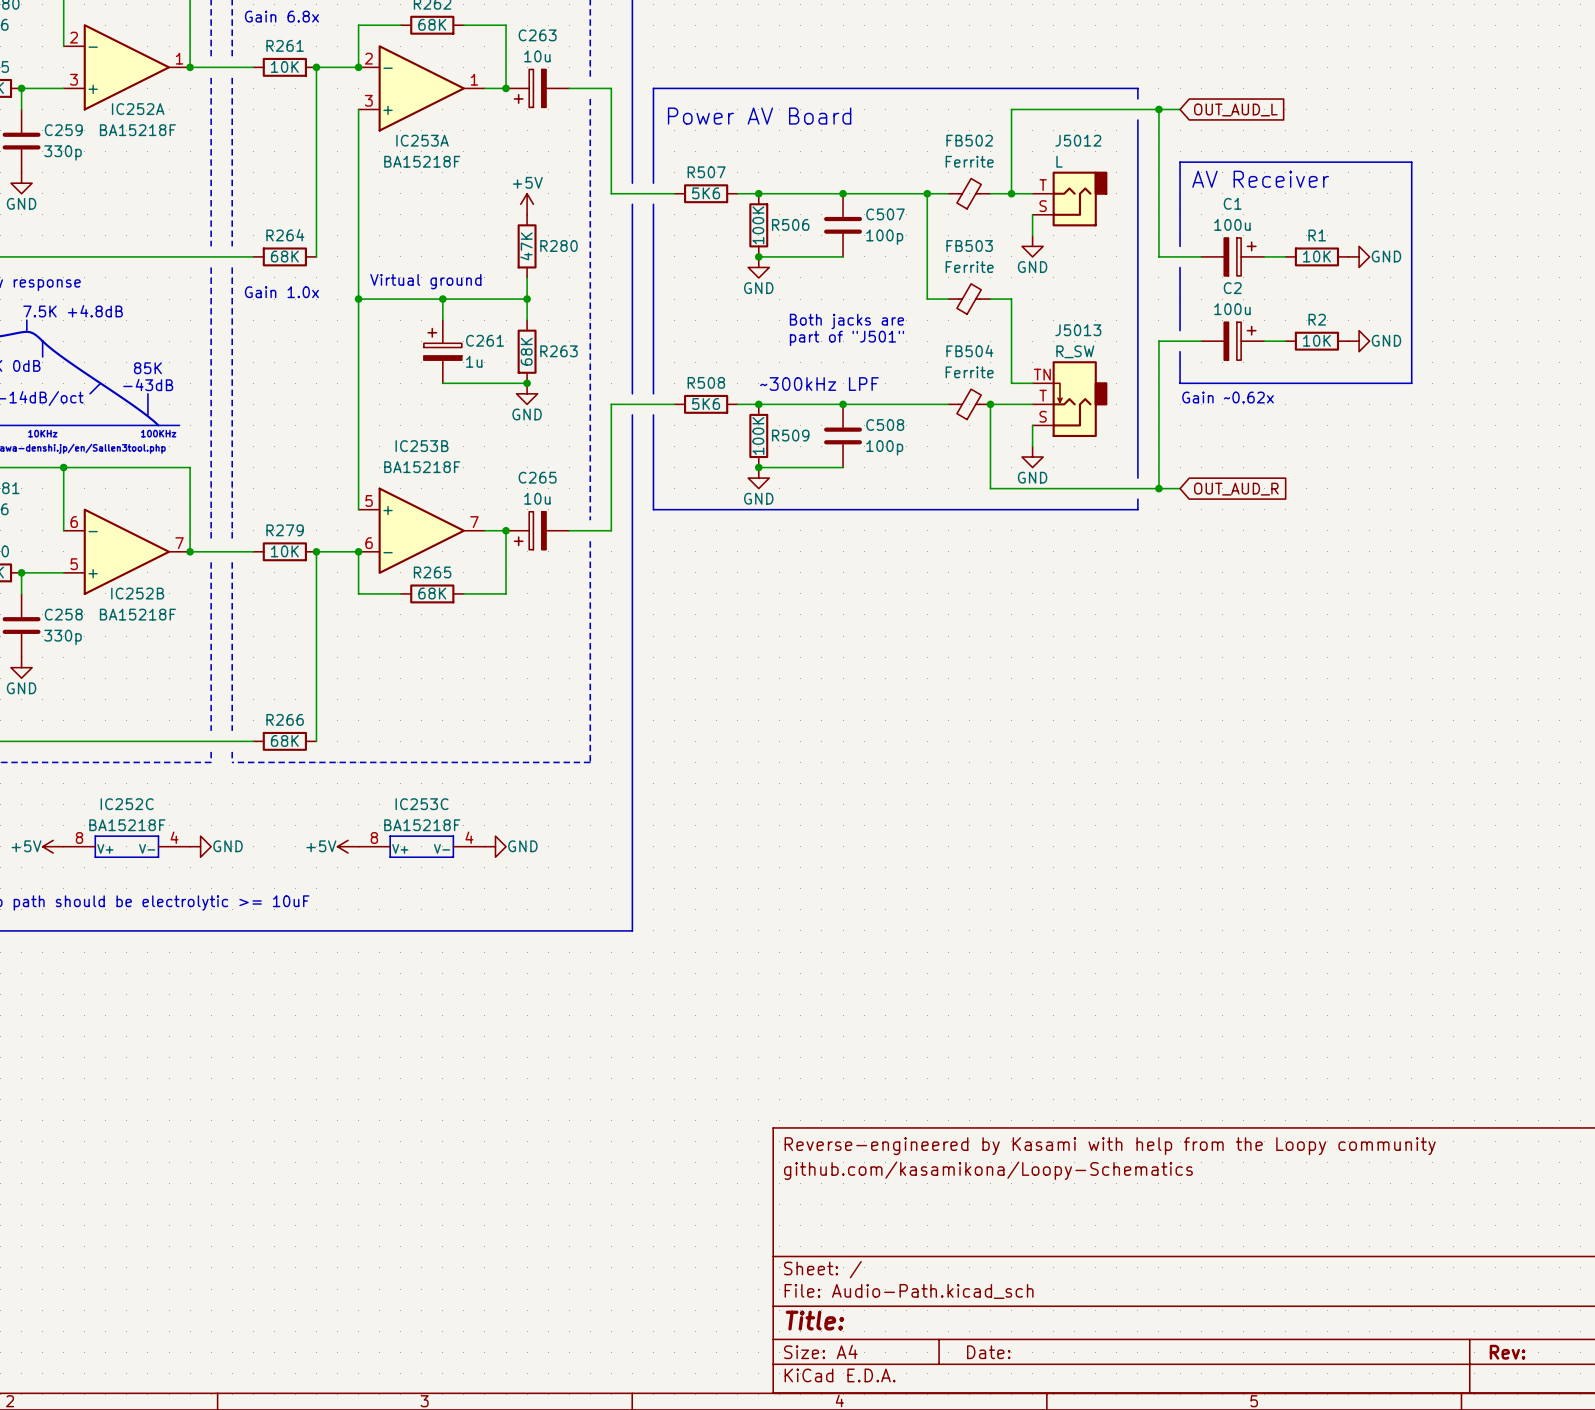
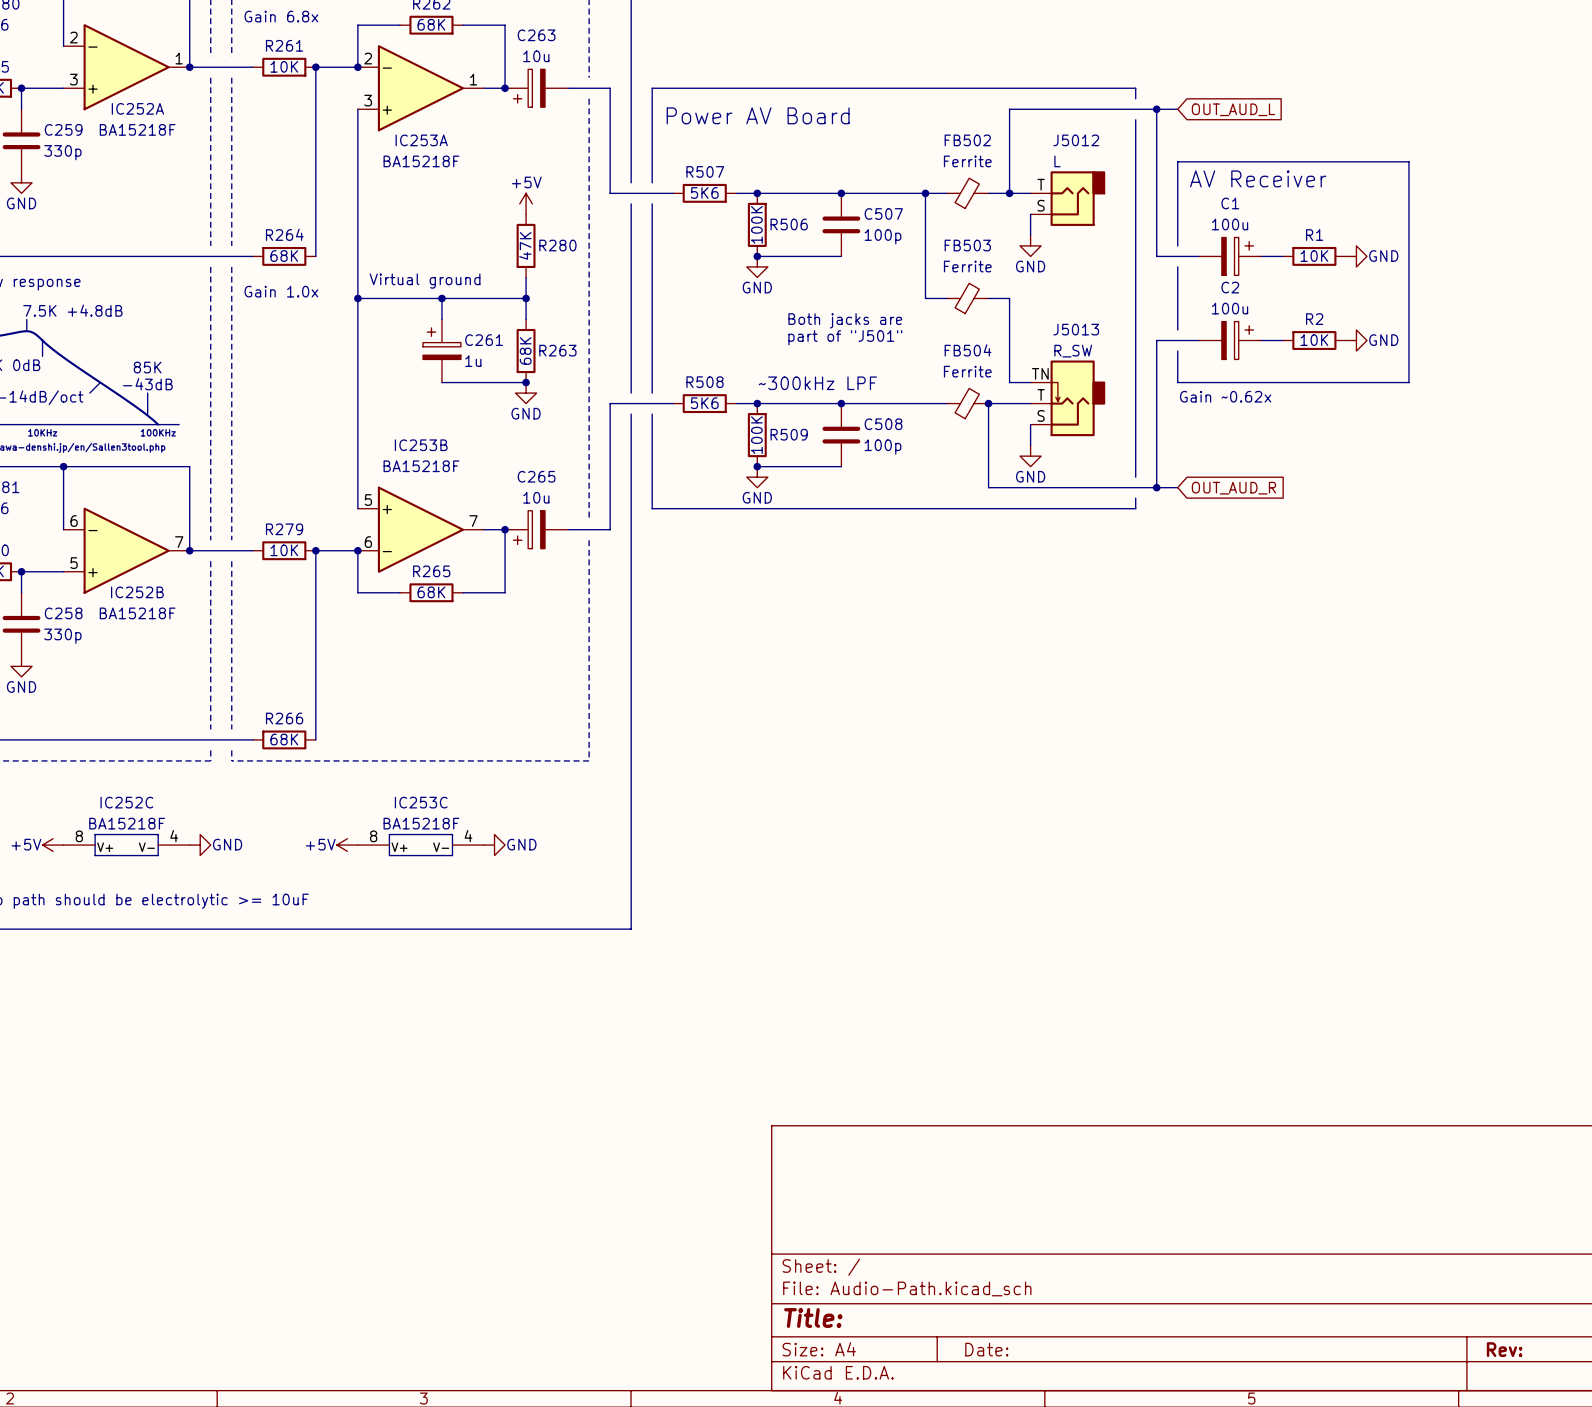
title block: Reverse-engineered by Kasami with help from the Loopy community (1110, 1146) -> none
title block: github.com/kasamikona/Loopy-Schematics (988, 1170) -> none

